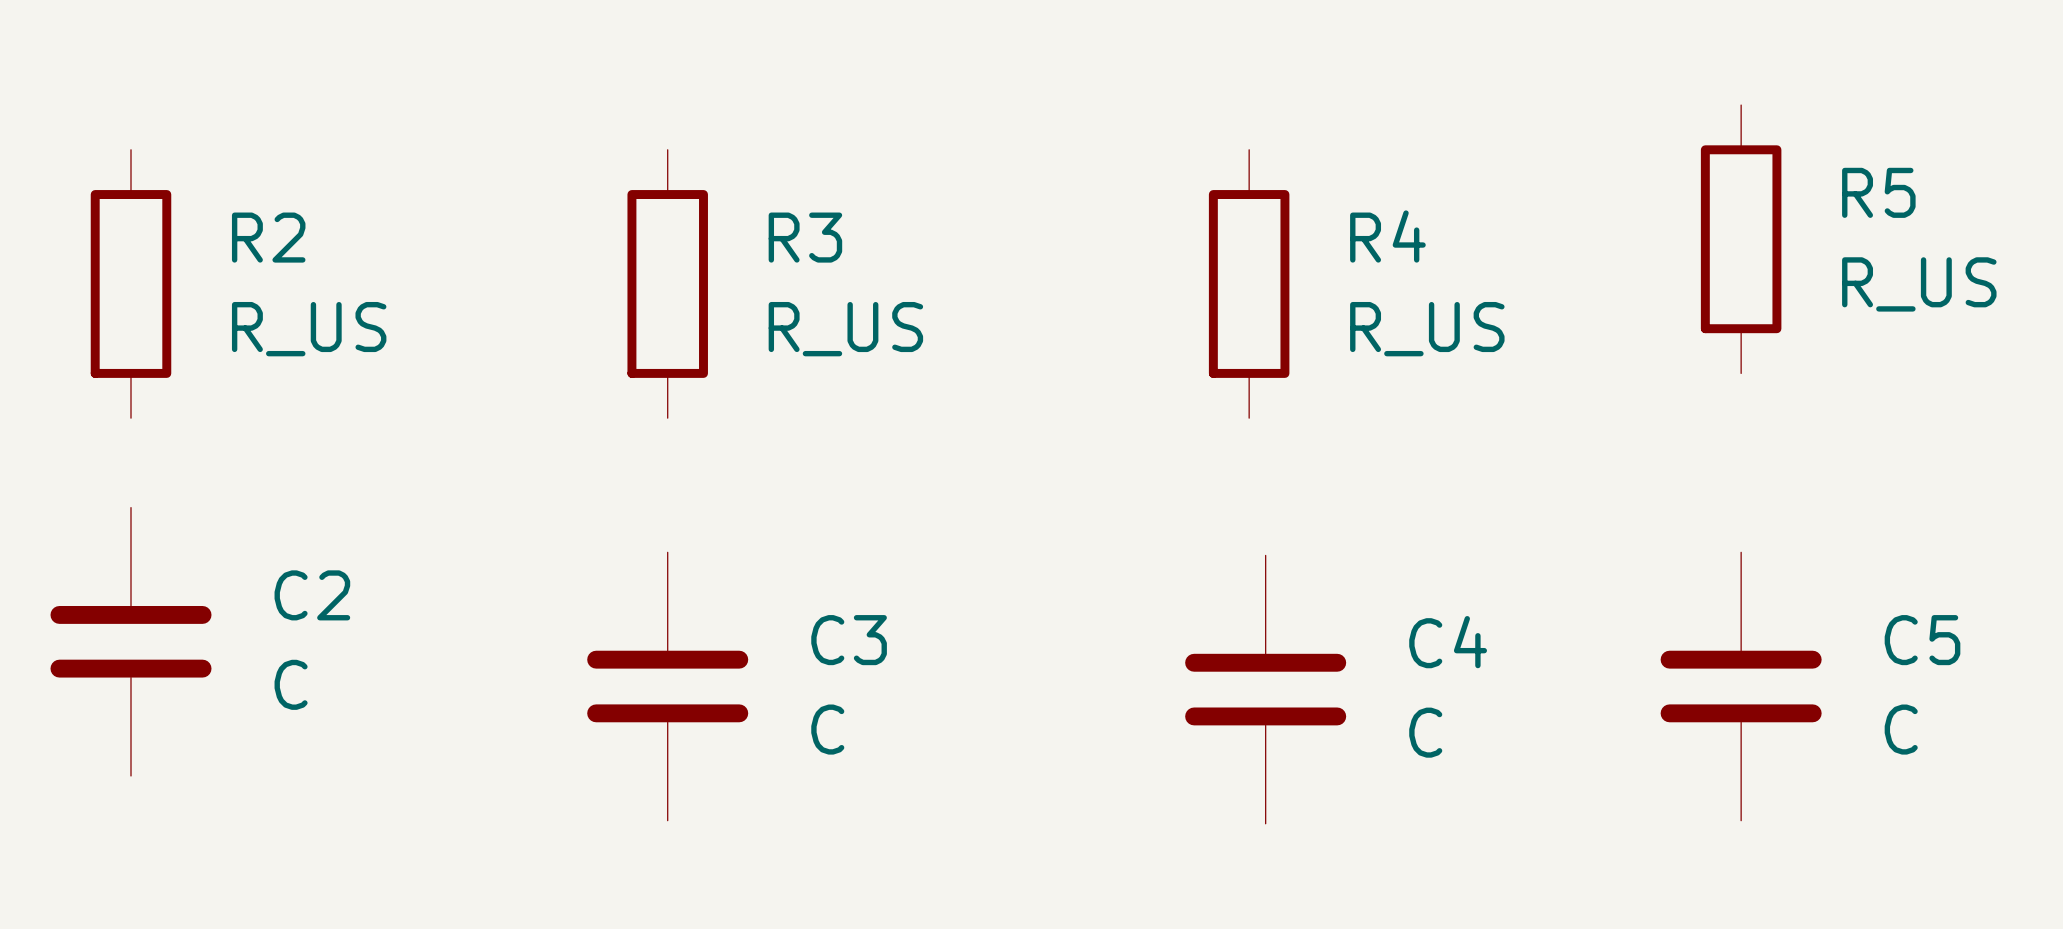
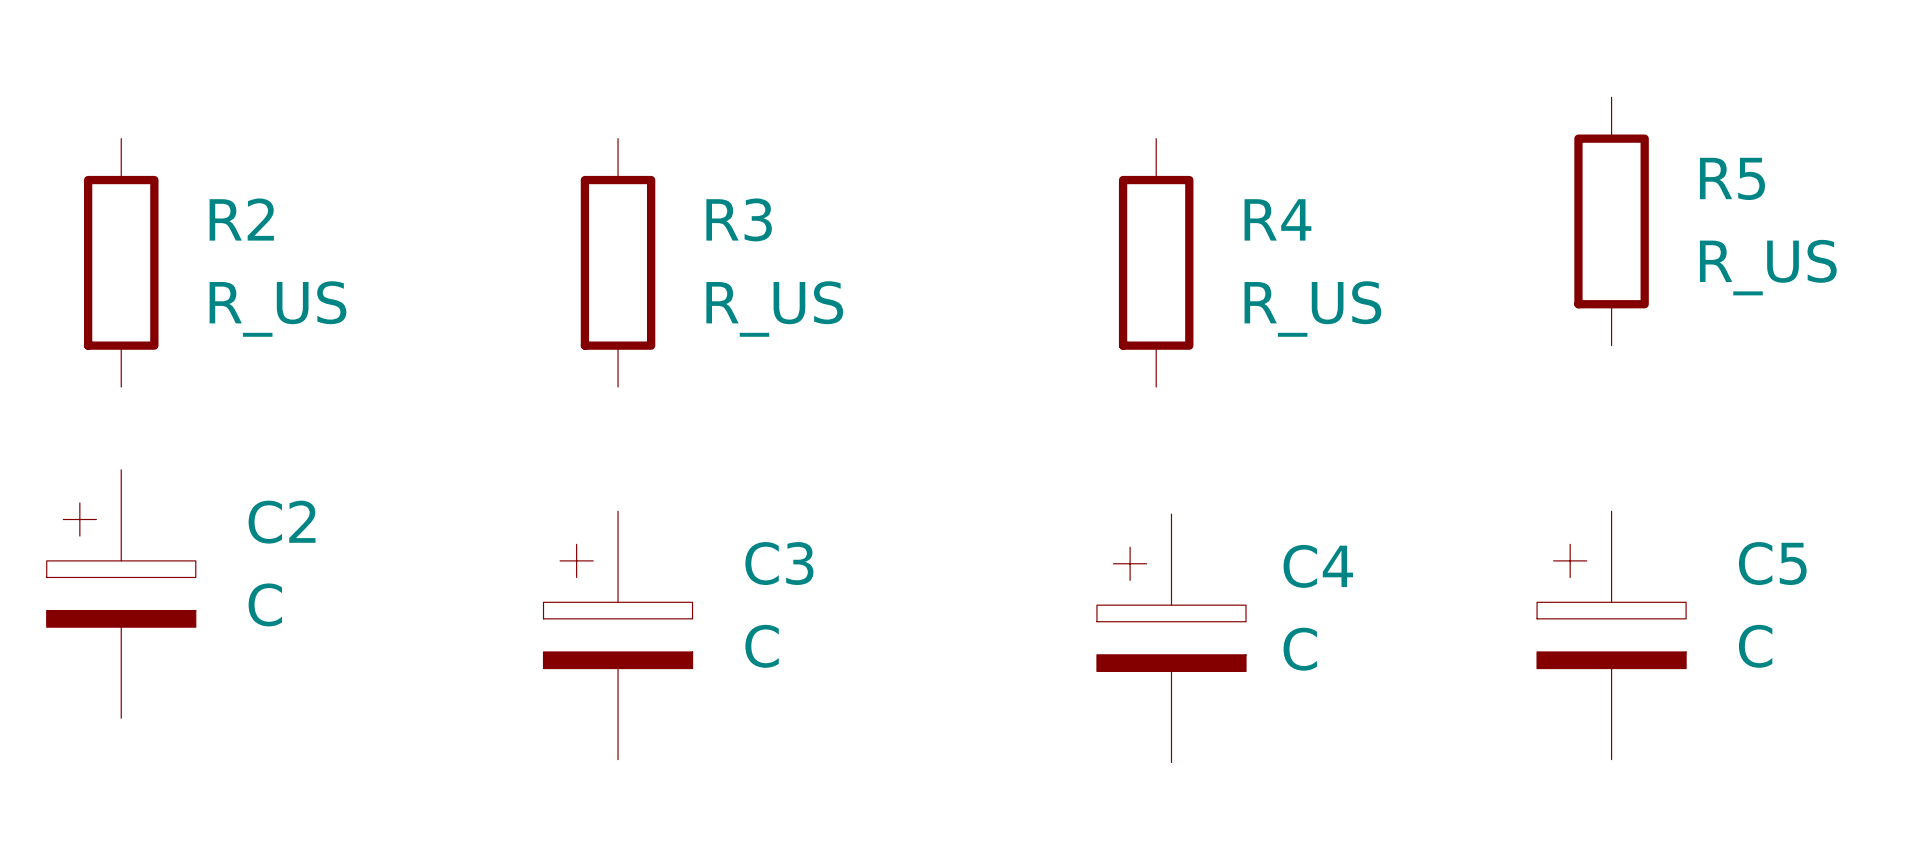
C2 symbol: [50, 507, 212, 776] -> [46, 469, 196, 719]
C3 symbol: [587, 552, 749, 821] -> [543, 511, 693, 760]
C5 symbol: [1660, 552, 1822, 821] -> [1537, 511, 1687, 760]
C4 symbol: [1185, 555, 1347, 824] -> [1096, 514, 1247, 763]

